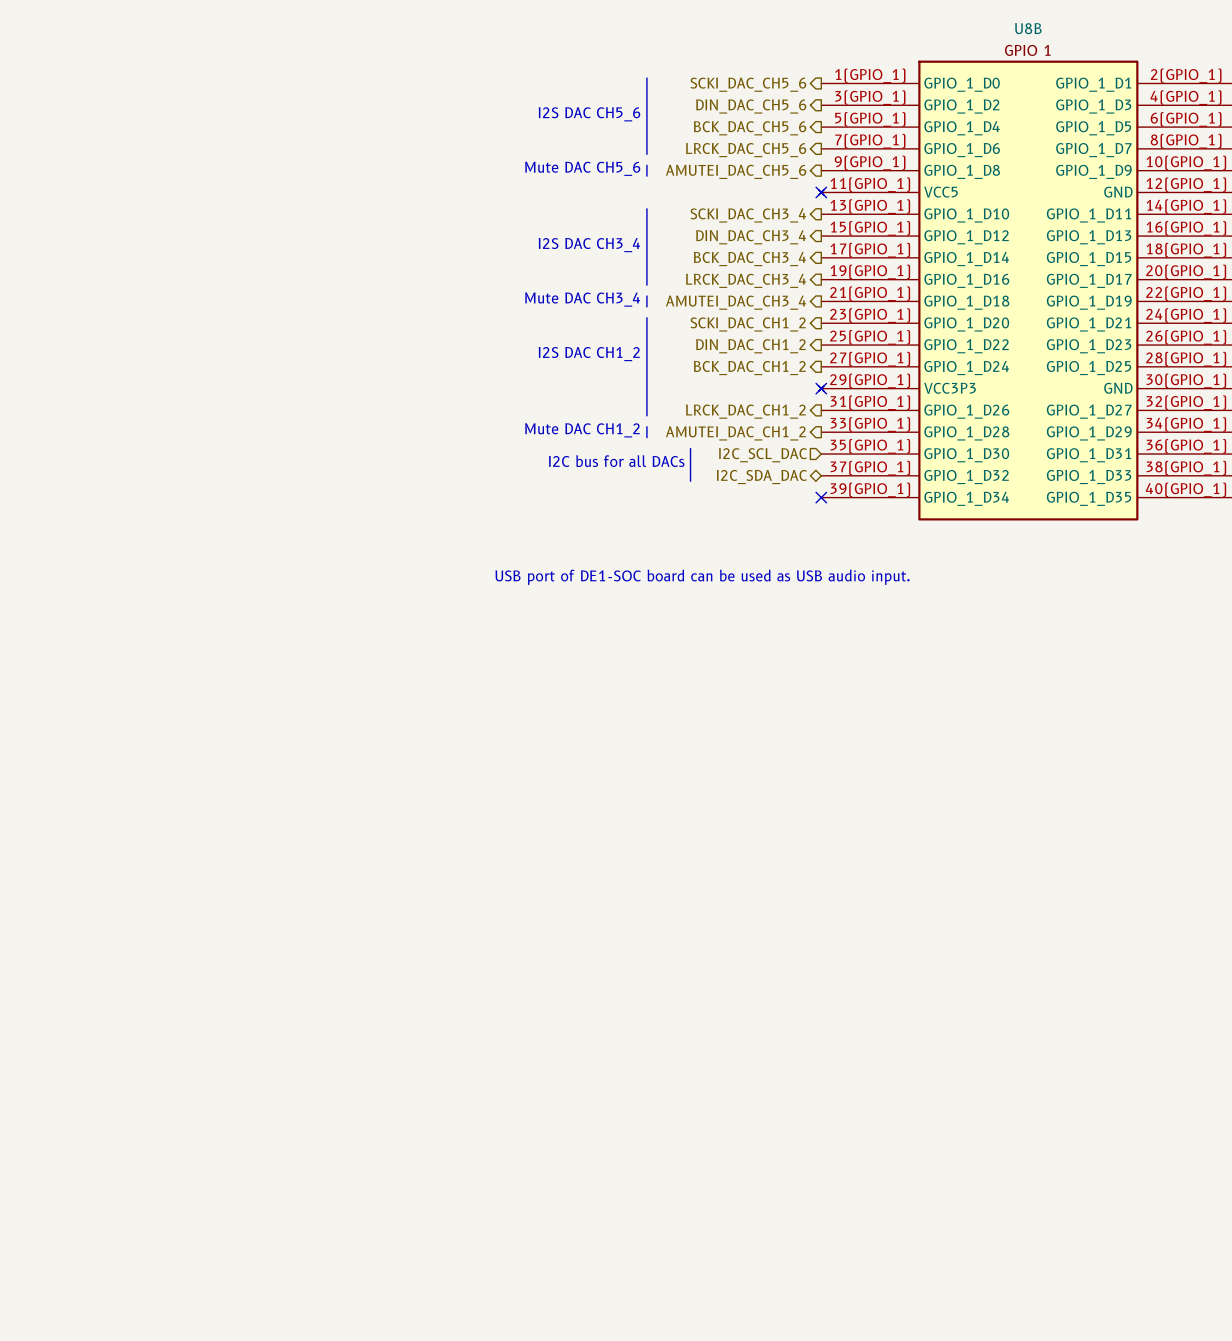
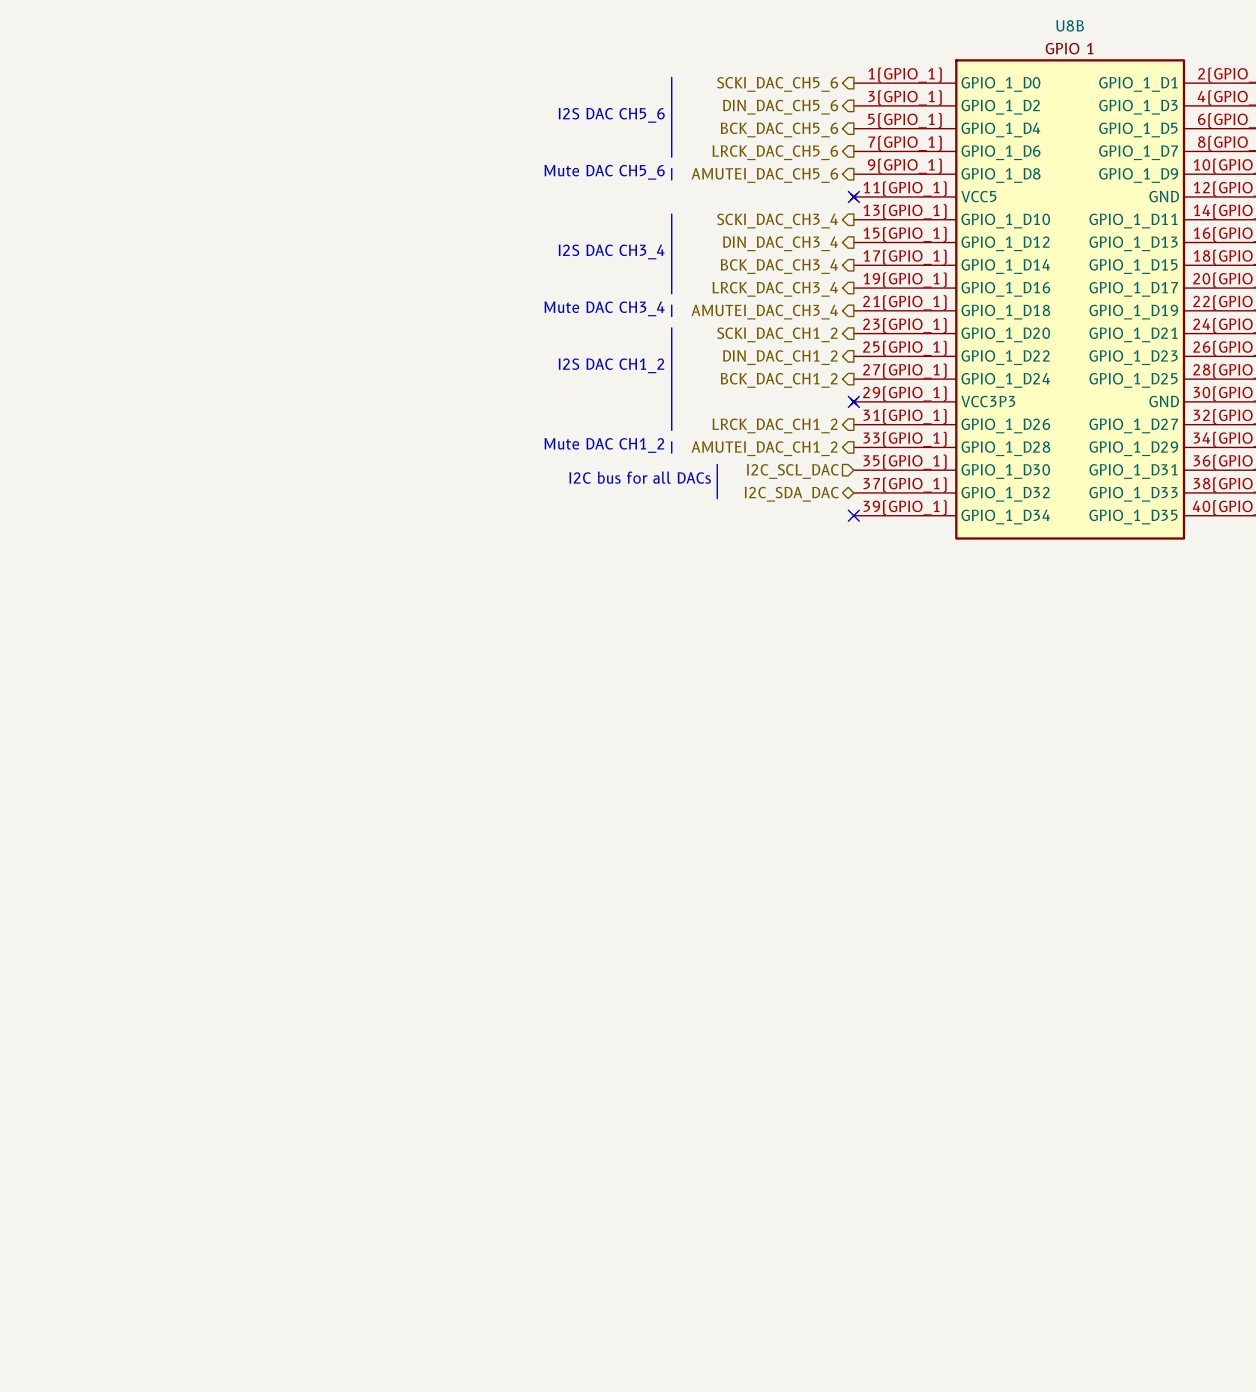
text: USB port of DE1-SOC board can be used as USB audio input. (702, 577) -> none

